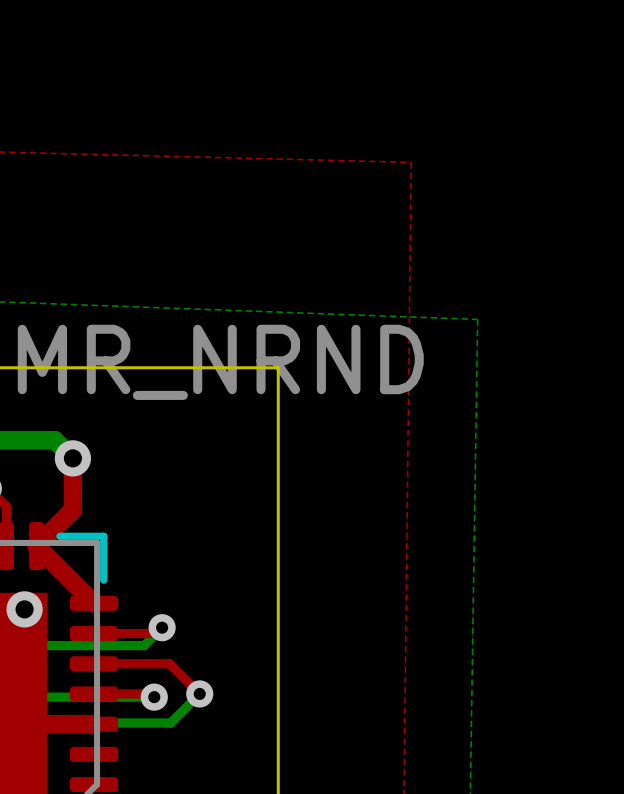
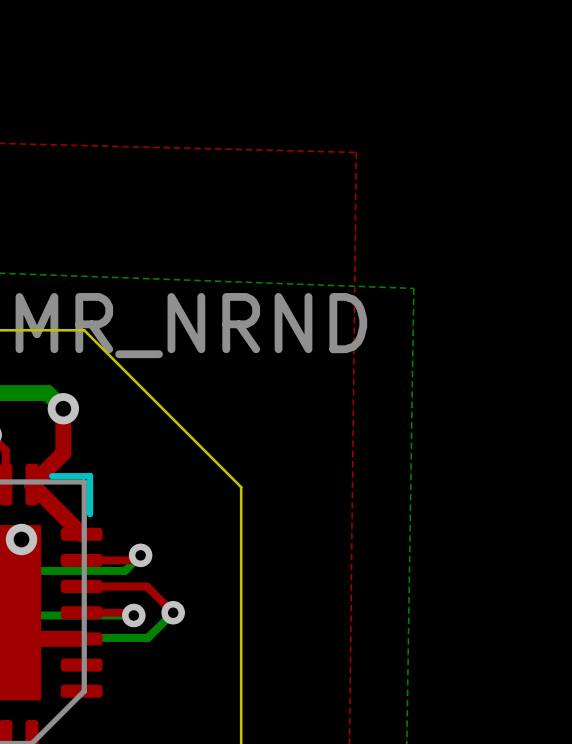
board edge: (97, 367) (278, 367) (278, 548) -> (84, 330) (241, 487)

